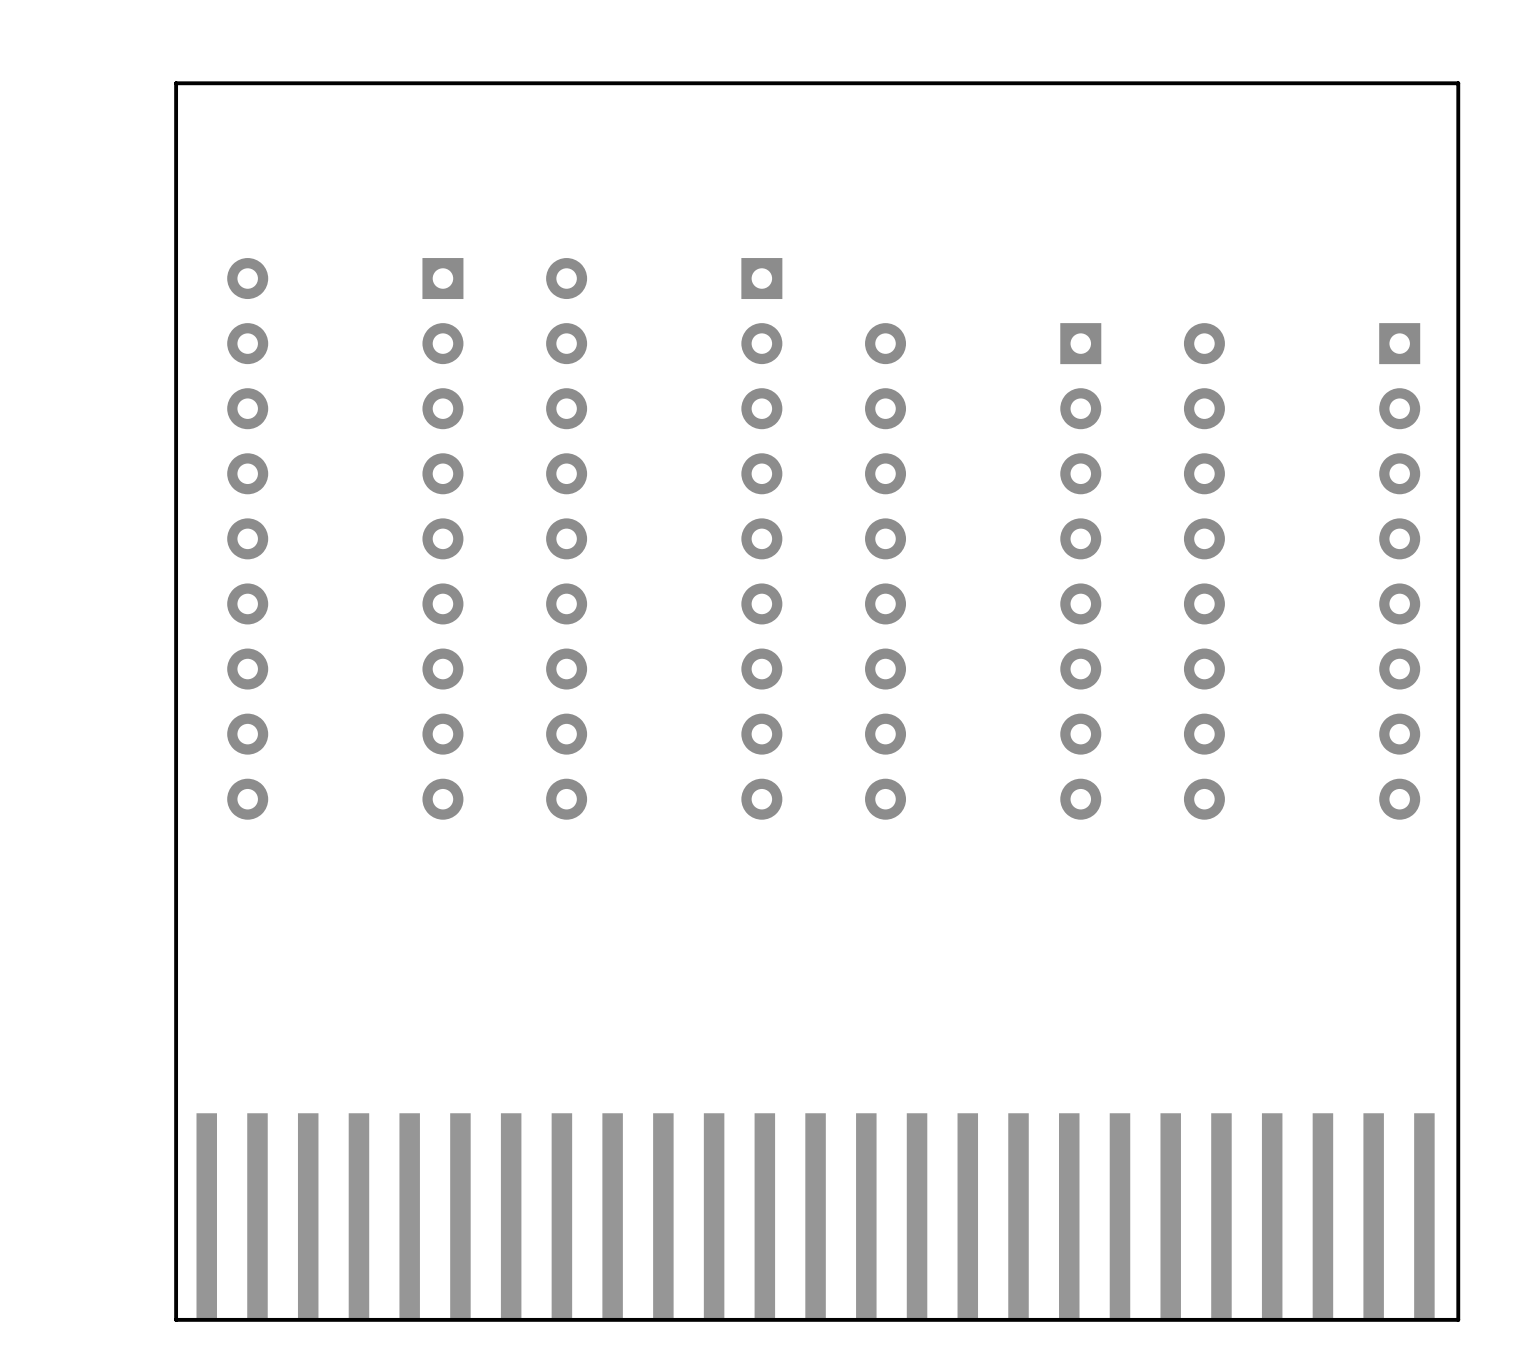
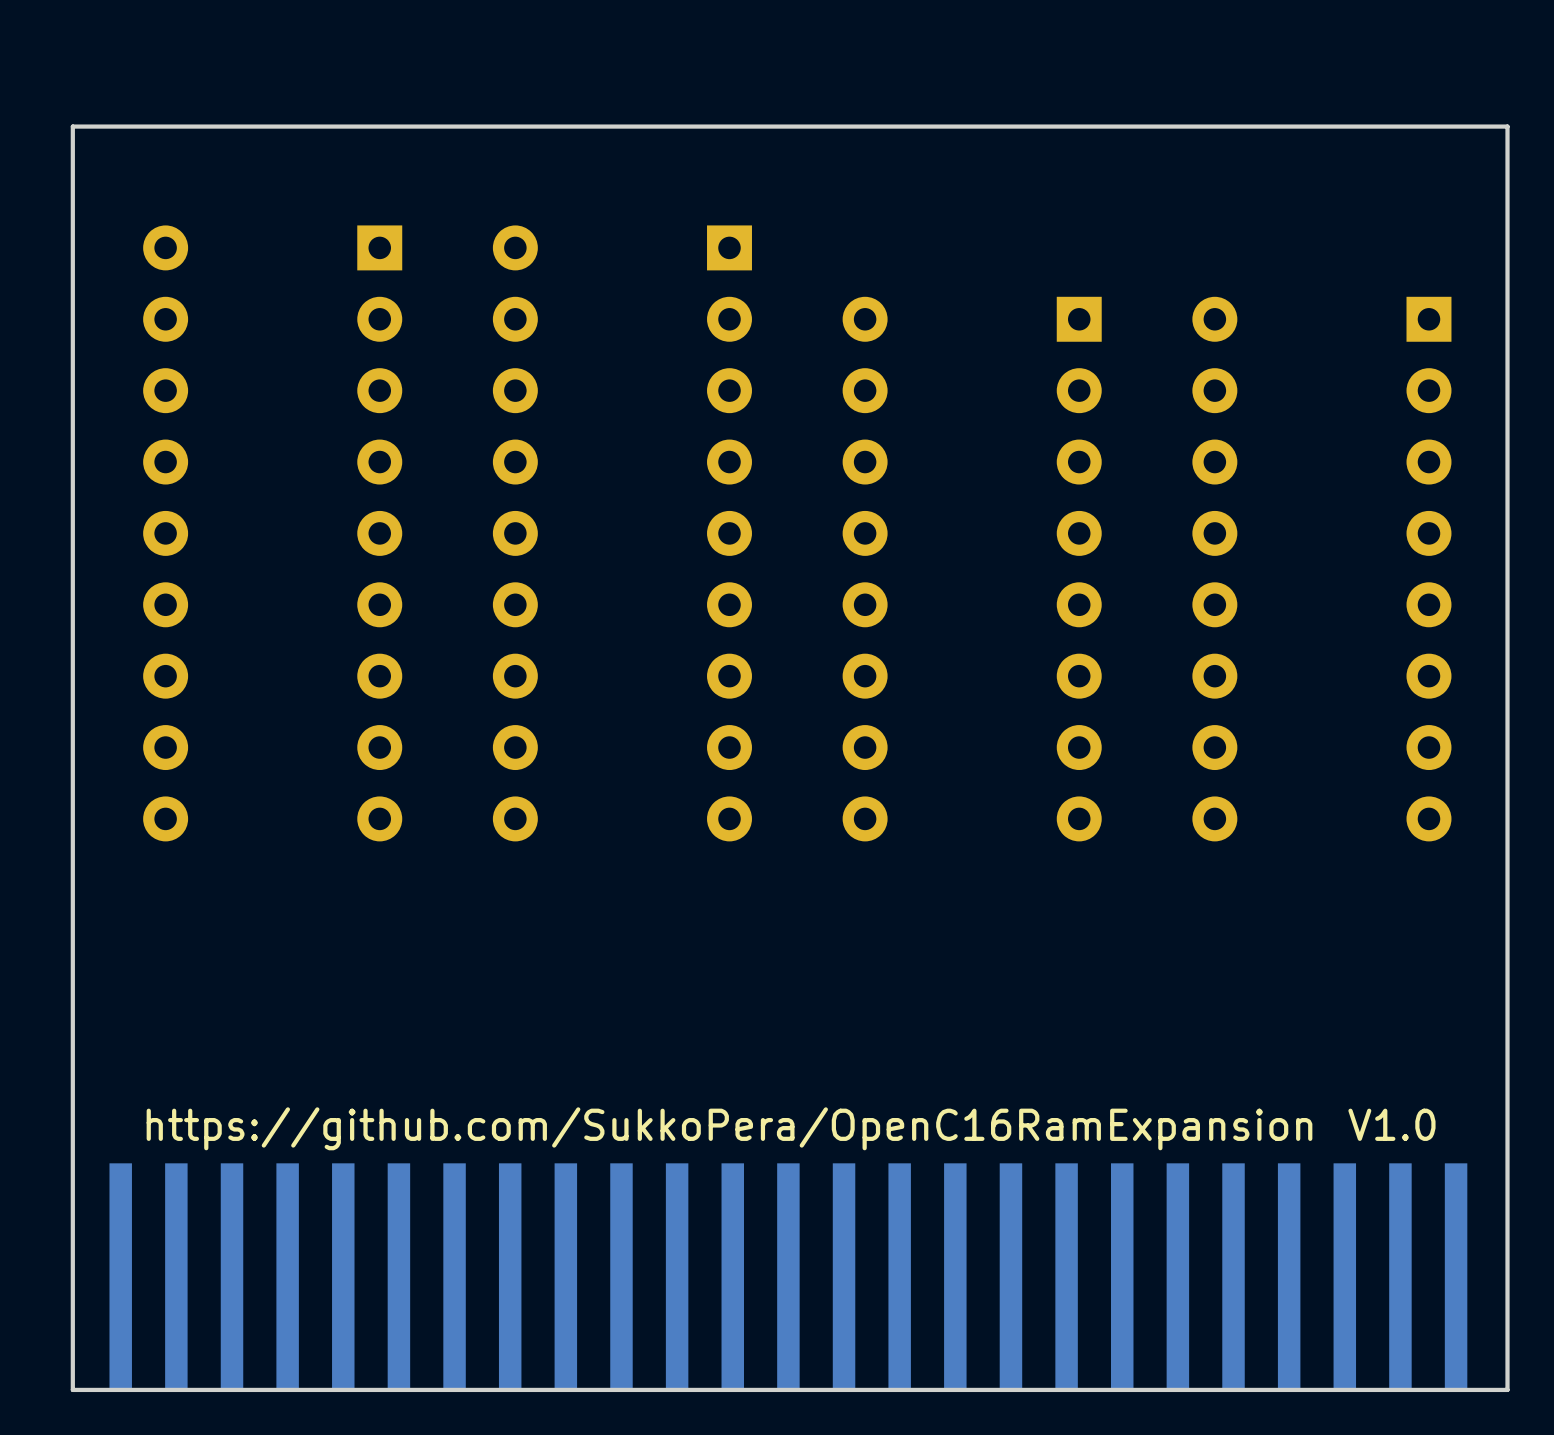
text: none -> V1.0 (1391, 1124)
text: none -> https://github.com/SukkoPera/OpenC16RamExpansion (729, 1128)
board edge: (1458, 1319) (1458, 83) (176, 83) (176, 1319) -> (1493, 1389) (1507, 1389) (1507, 126) (72, 126) (72, 1389) (87, 1389)

